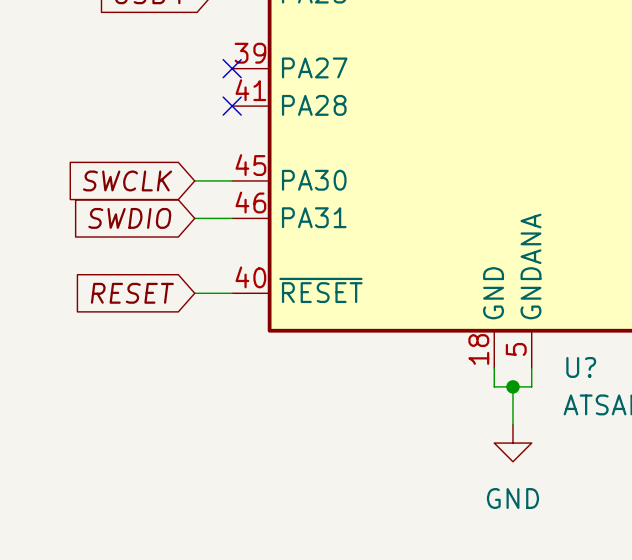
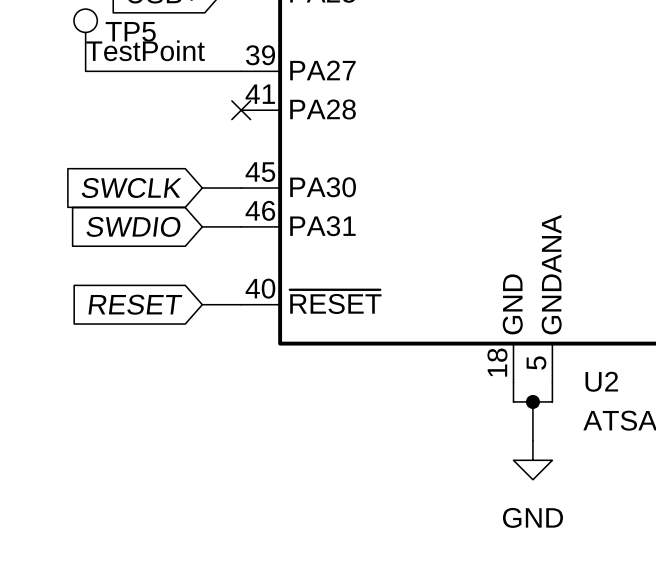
TP5: none -> TestPoint (85, 40)
wire: none -> (85, 71) (241, 71)
no-connect mark: (232, 68) -> none
U? name: U? (581, 367) -> U2 (601, 381)

